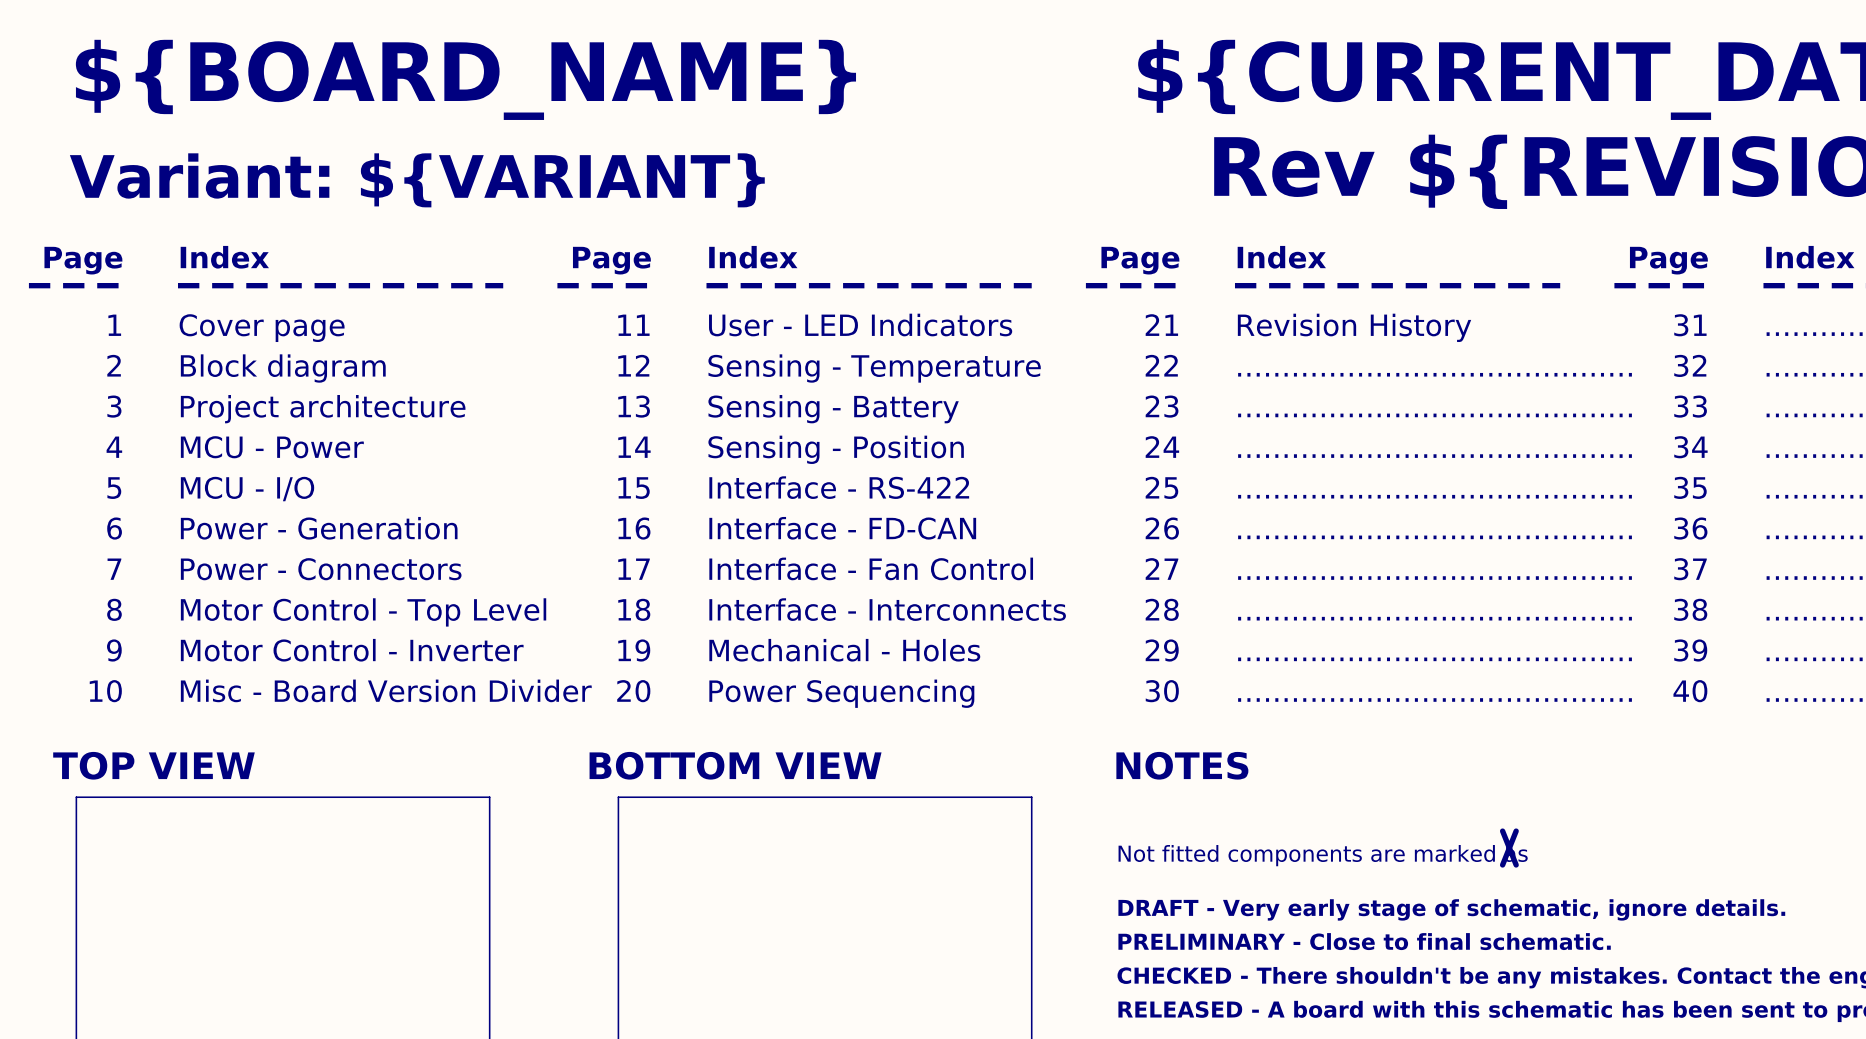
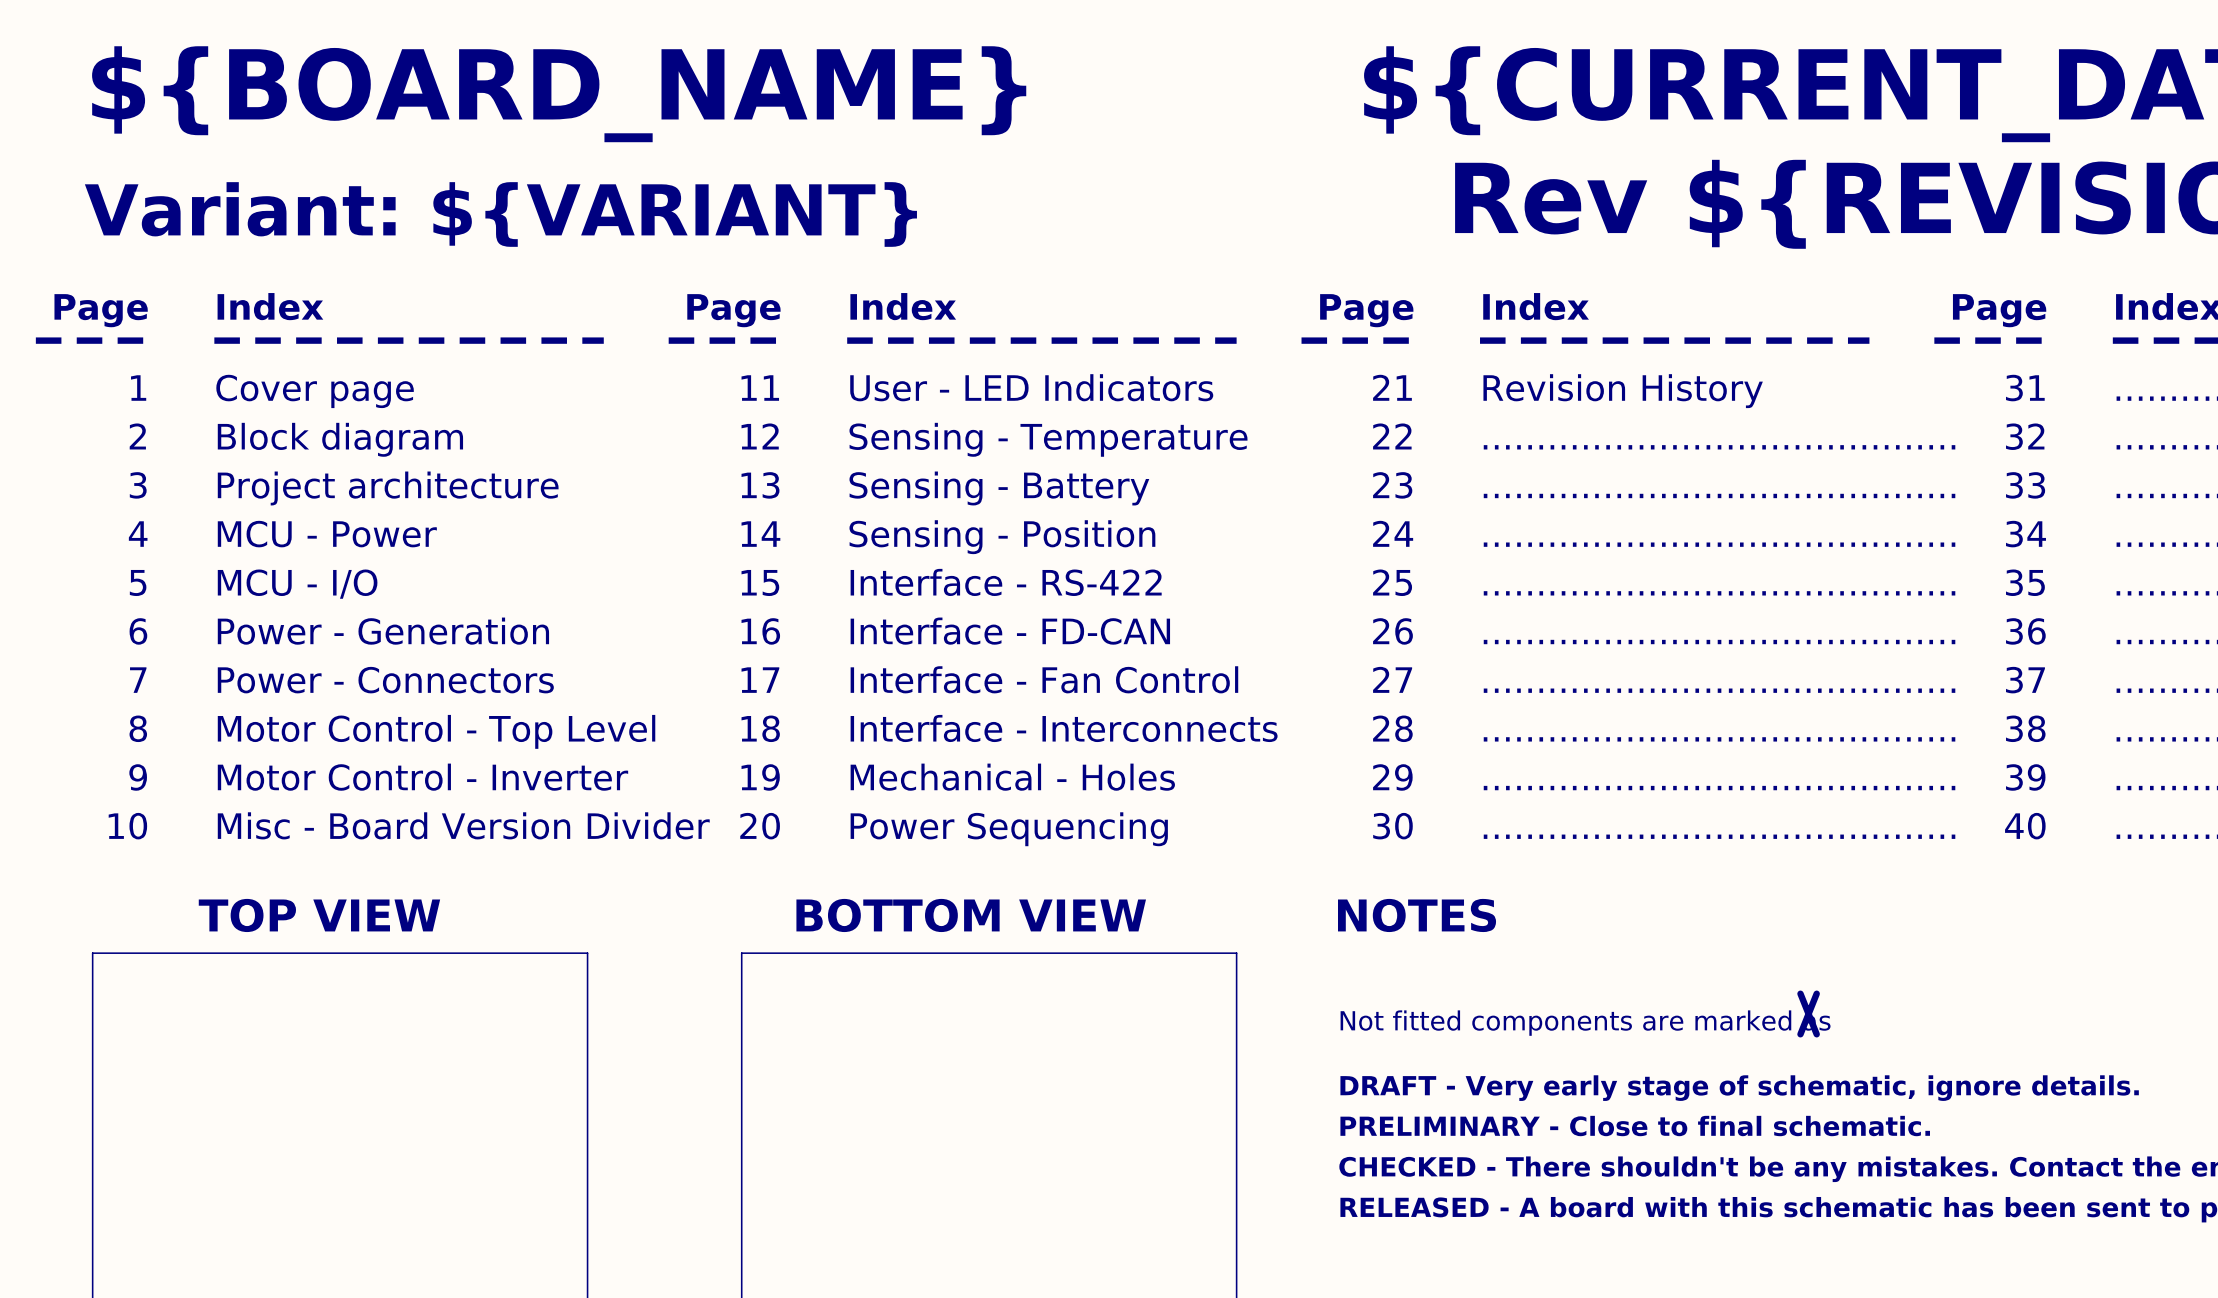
text position: TOP VIEW (153, 765) -> TOP VIEW (319, 915)
text position: BOTTOM VIEW (735, 765) -> BOTTOM VIEW (971, 915)

